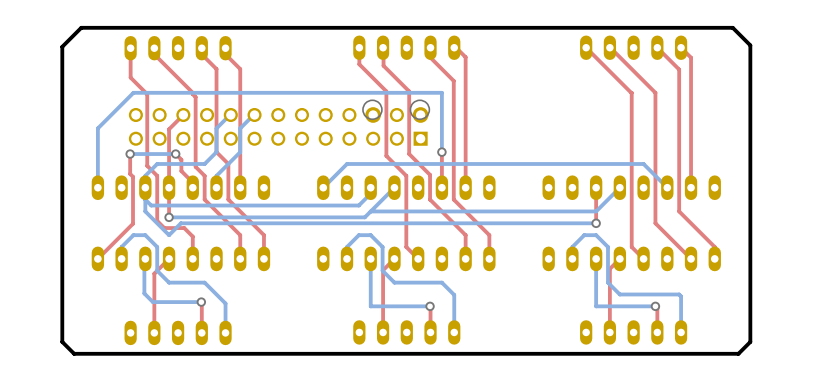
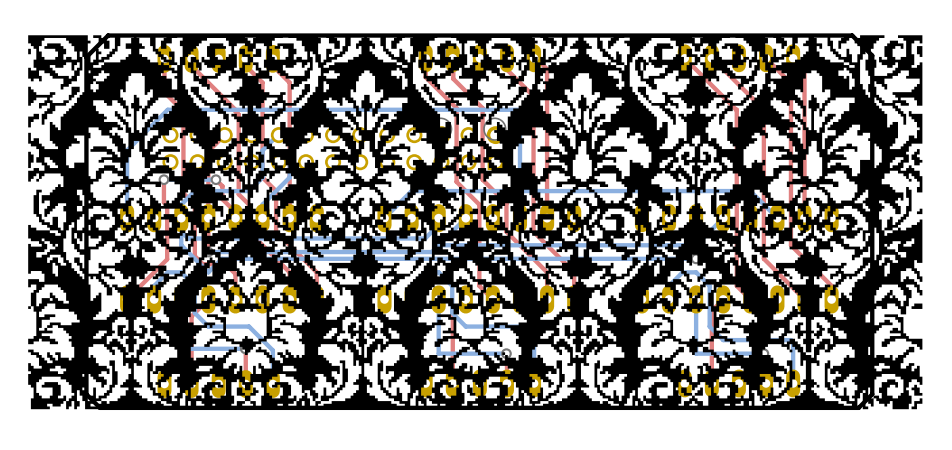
drawing: none -> [28, 35, 923, 410]

